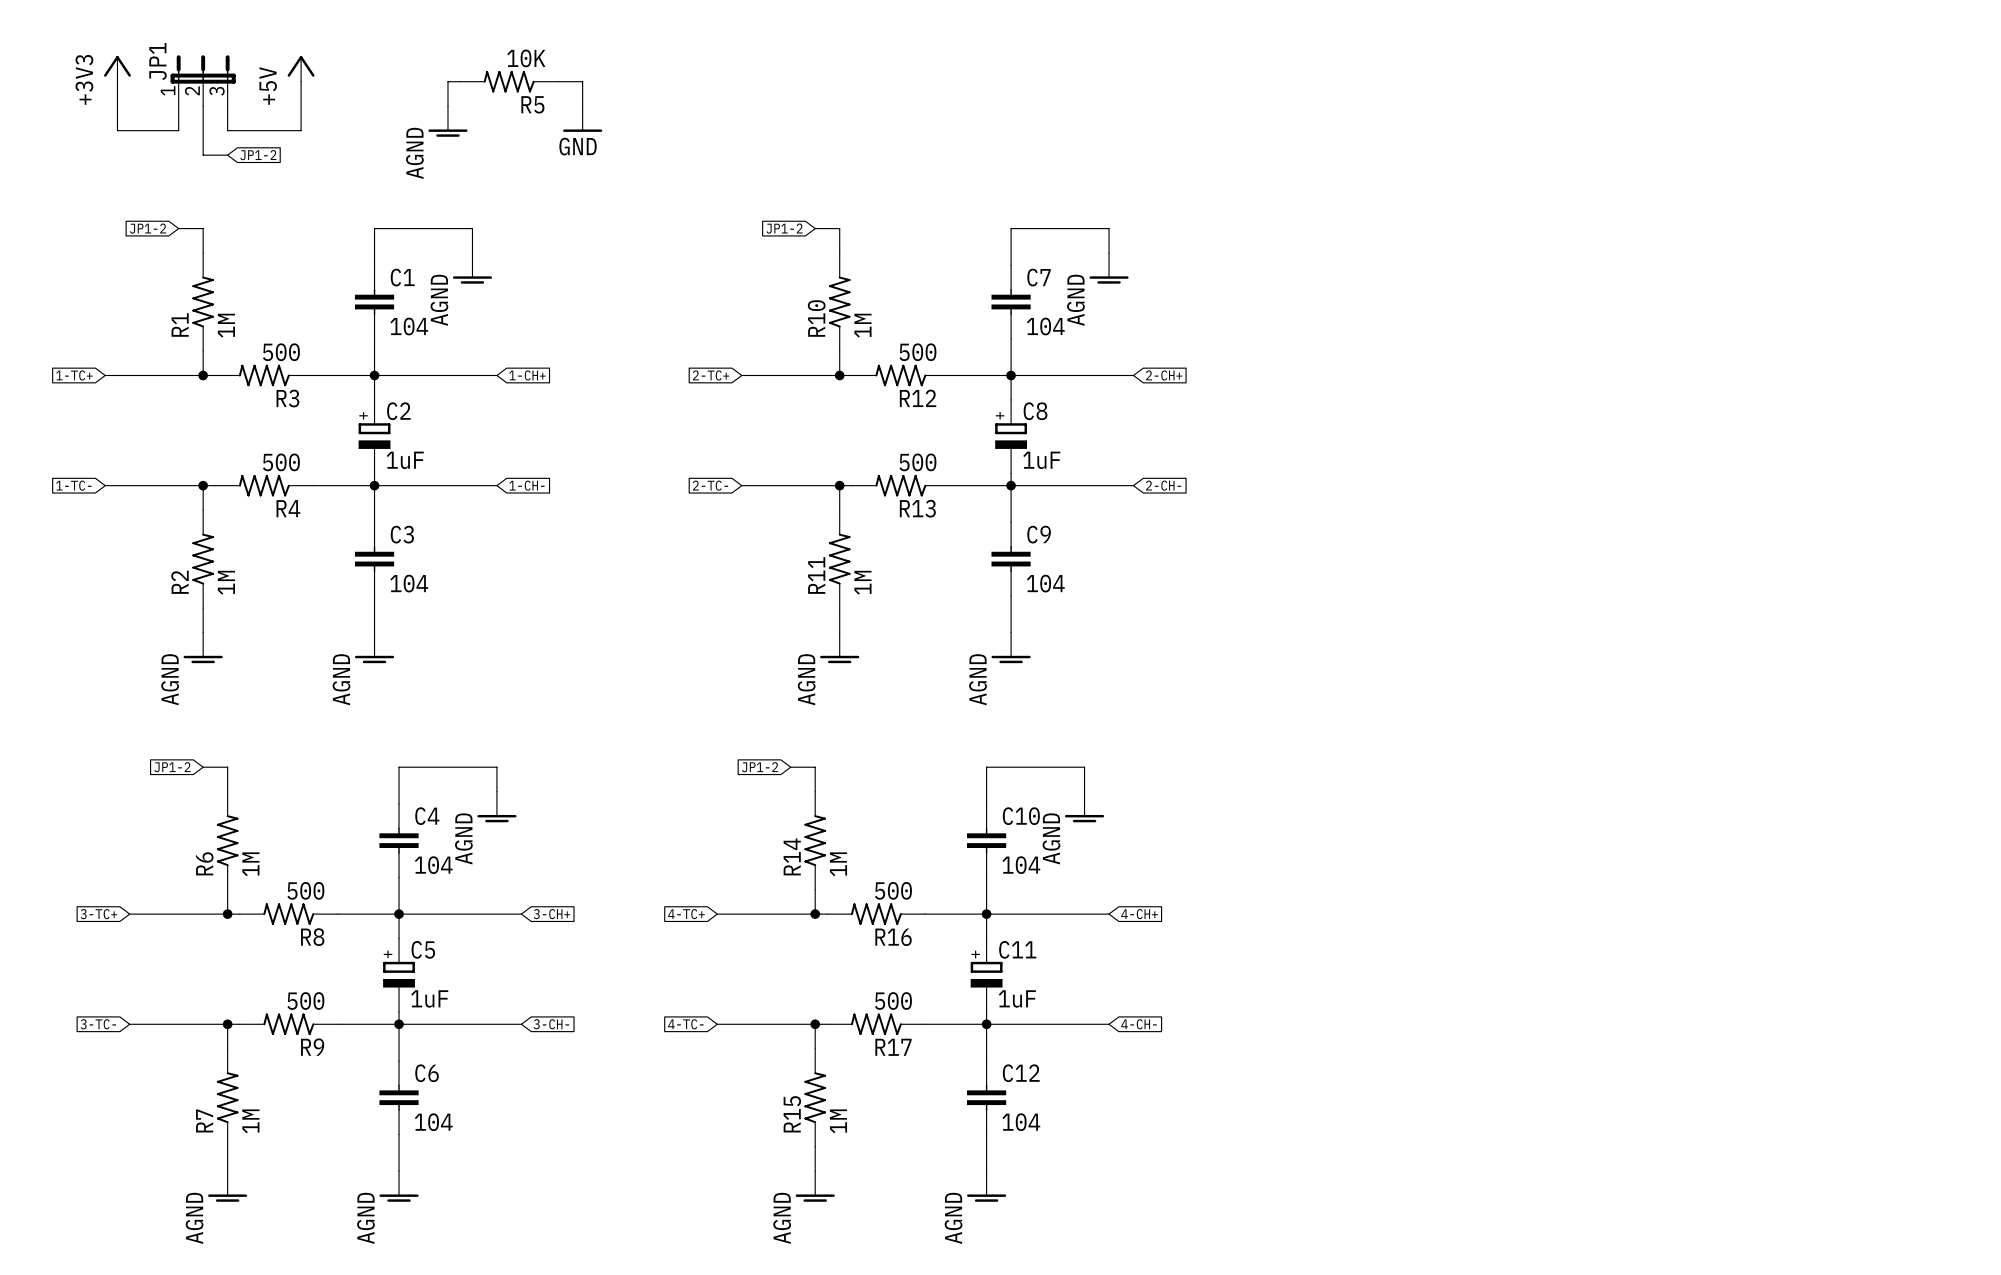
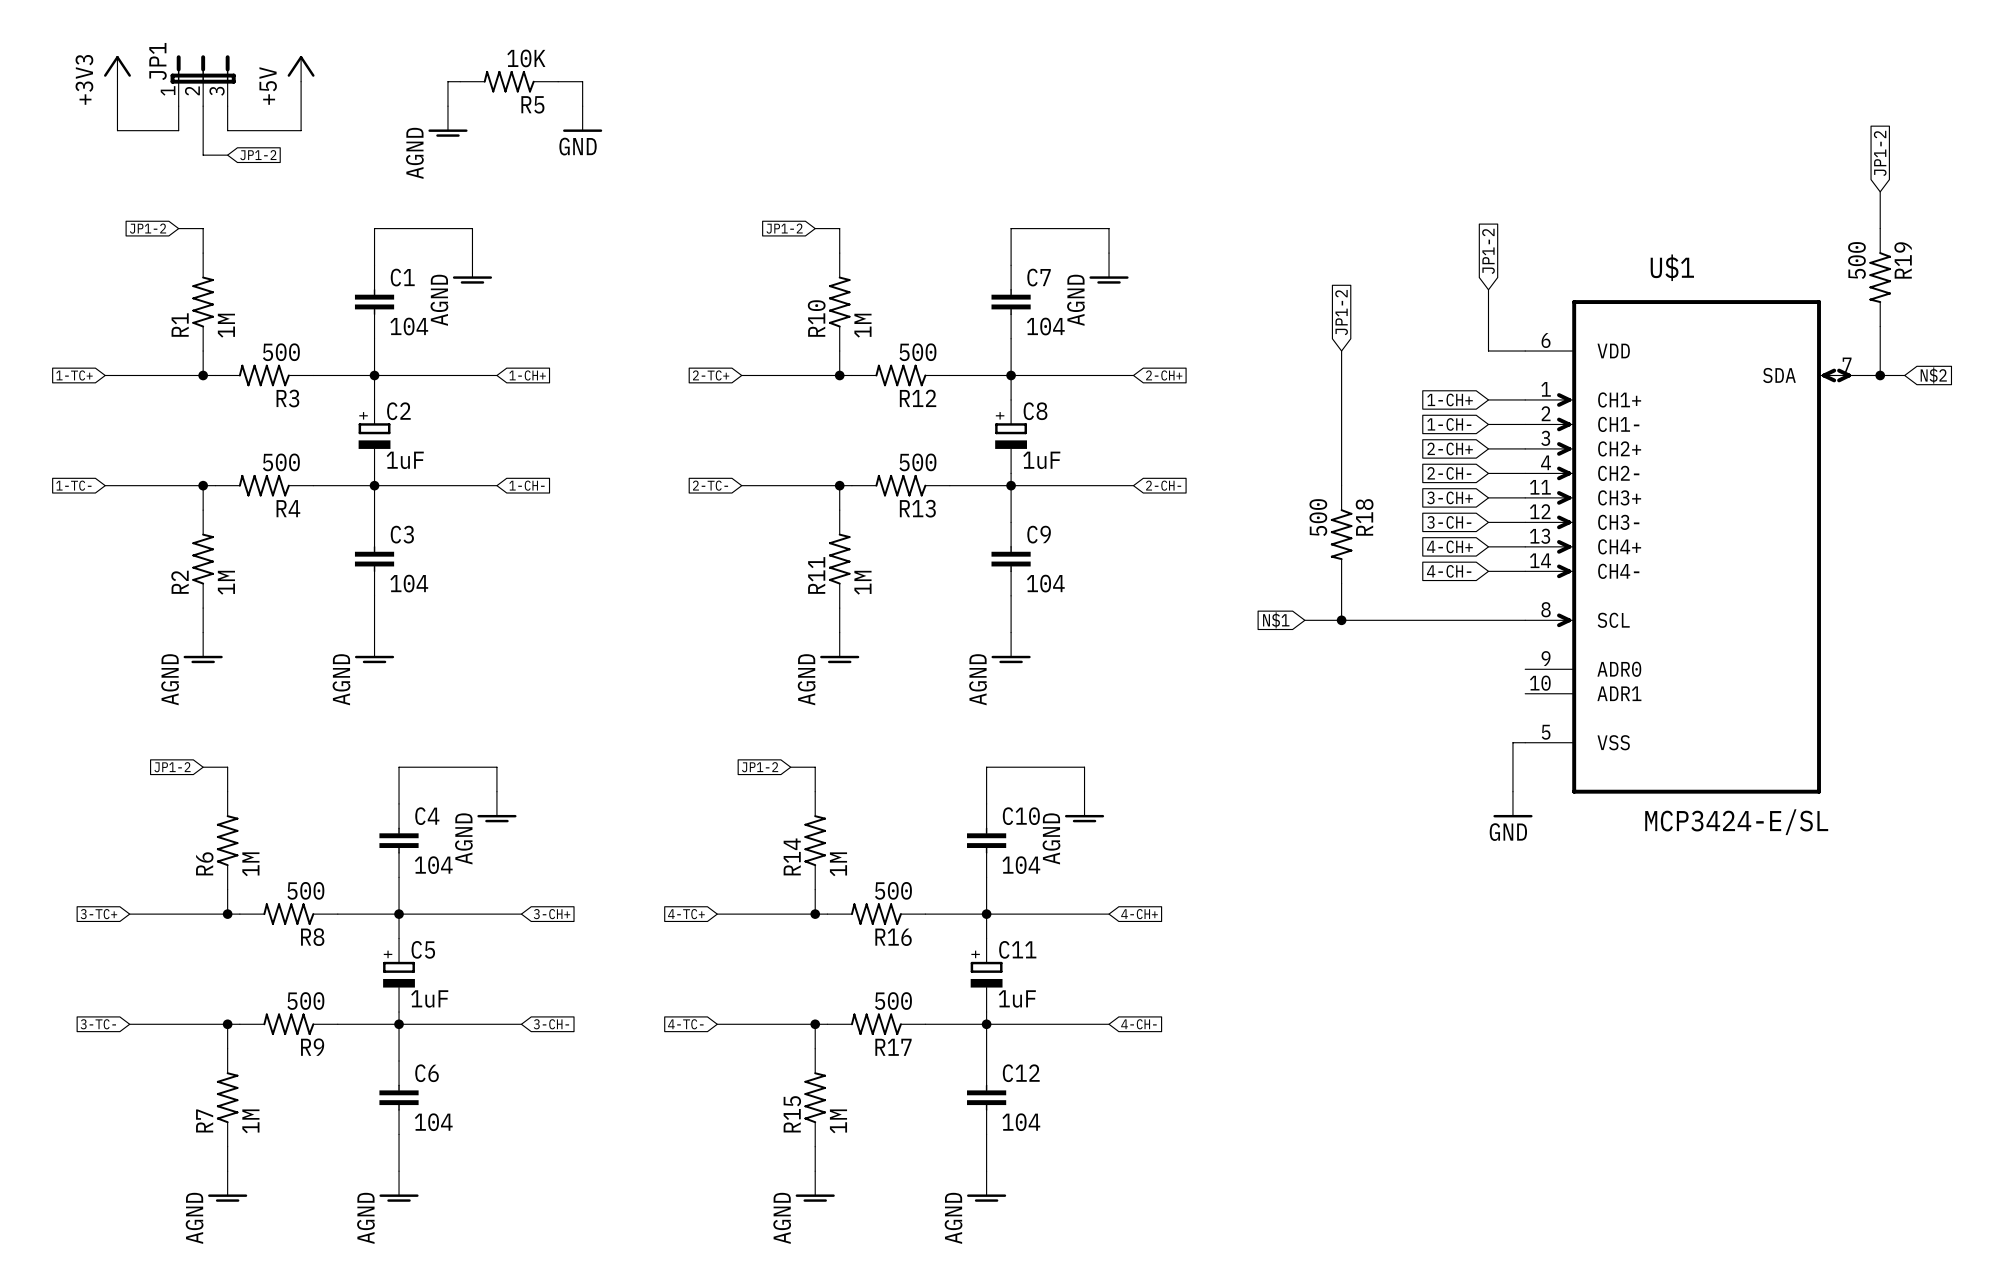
global label: none -> JP1-2 (1880, 153)
wire: none -> (1880, 191) (1880, 228)
global label: none -> JP1-2 (1488, 251)
R19: none -> 500 (1880, 277)
wire: none -> (1488, 289) (1488, 351) (1525, 351)
global label: none -> JP1-2 (1341, 312)
wire: none -> (1880, 326) (1880, 375)
wire: none -> (1341, 351) (1341, 485)
wire: none -> (1867, 375) (1904, 375)
junction: none -> (1880, 375)
global label: none -> N$2 (1933, 375)
global label: none -> 1-CH+ (1450, 399)
wire: none -> (1488, 399) (1525, 399)
global label: none -> 1-CH- (1449, 424)
wire: none -> (1488, 424) (1525, 424)
global label: none -> 2-CH+ (1450, 448)
wire: none -> (1488, 448) (1525, 448)
global label: none -> 2-CH- (1449, 473)
wire: none -> (1488, 473) (1525, 473)
global label: none -> 3-CH+ (1450, 497)
wire: none -> (1488, 497) (1525, 497)
global label: none -> 3-CH- (1449, 522)
wire: none -> (1488, 522) (1525, 522)
R18: none -> 500 (1341, 534)
global label: none -> 4-CH+ (1449, 546)
wire: none -> (1488, 546) (1525, 546)
U$1: none -> MCP3424-E/SL (1696, 546)
global label: none -> 4-CH- (1449, 571)
wire: none -> (1488, 571) (1525, 571)
wire: none -> (1341, 583) (1341, 620)
global label: none -> N$1 (1276, 620)
wire: none -> (1304, 620) (1525, 620)
junction: none -> (1341, 620)
wire: none -> (1525, 742) (1512, 742) (1512, 791)
power symbol: none -> GND (1512, 804)

